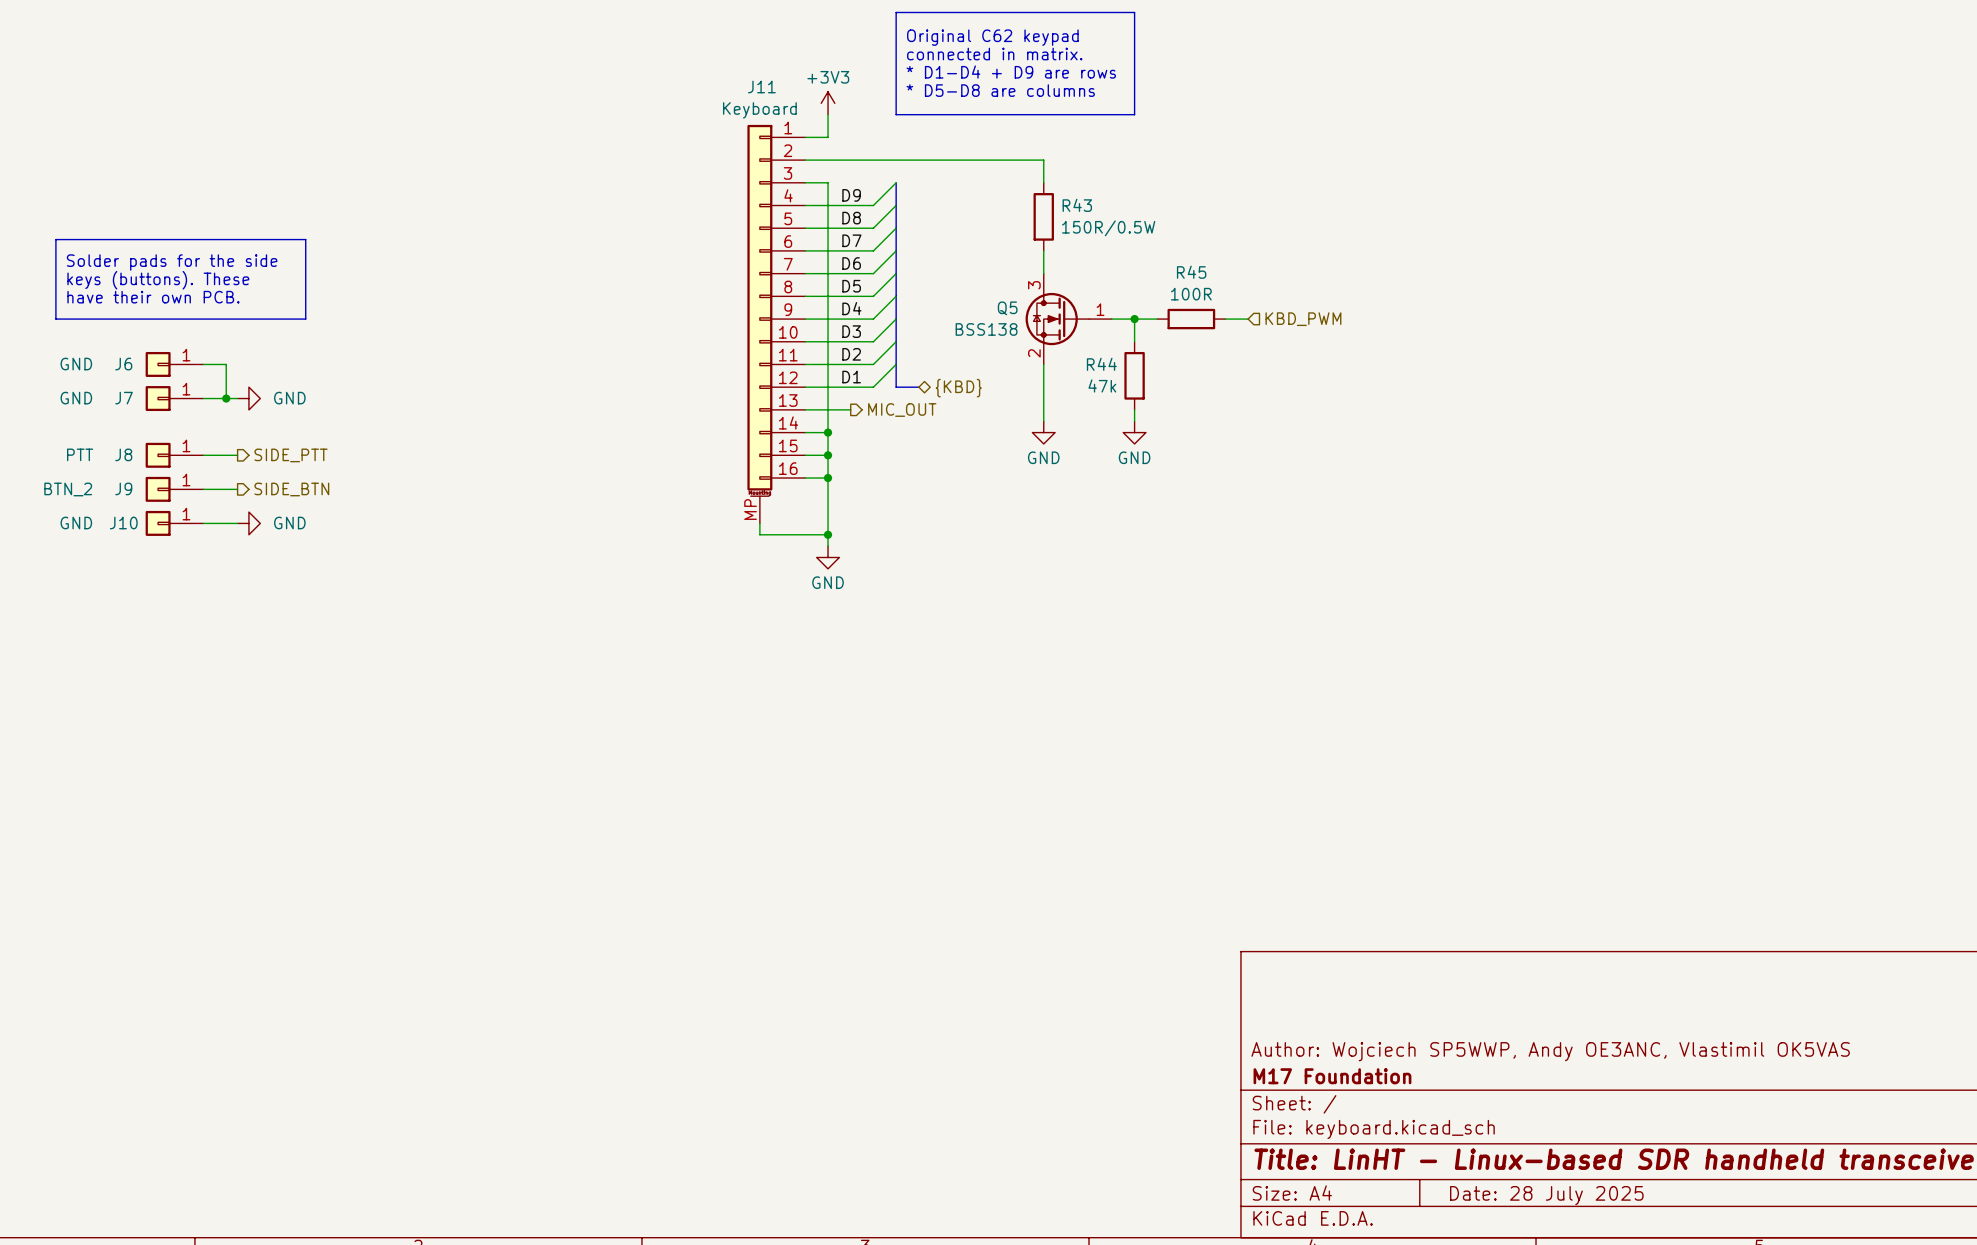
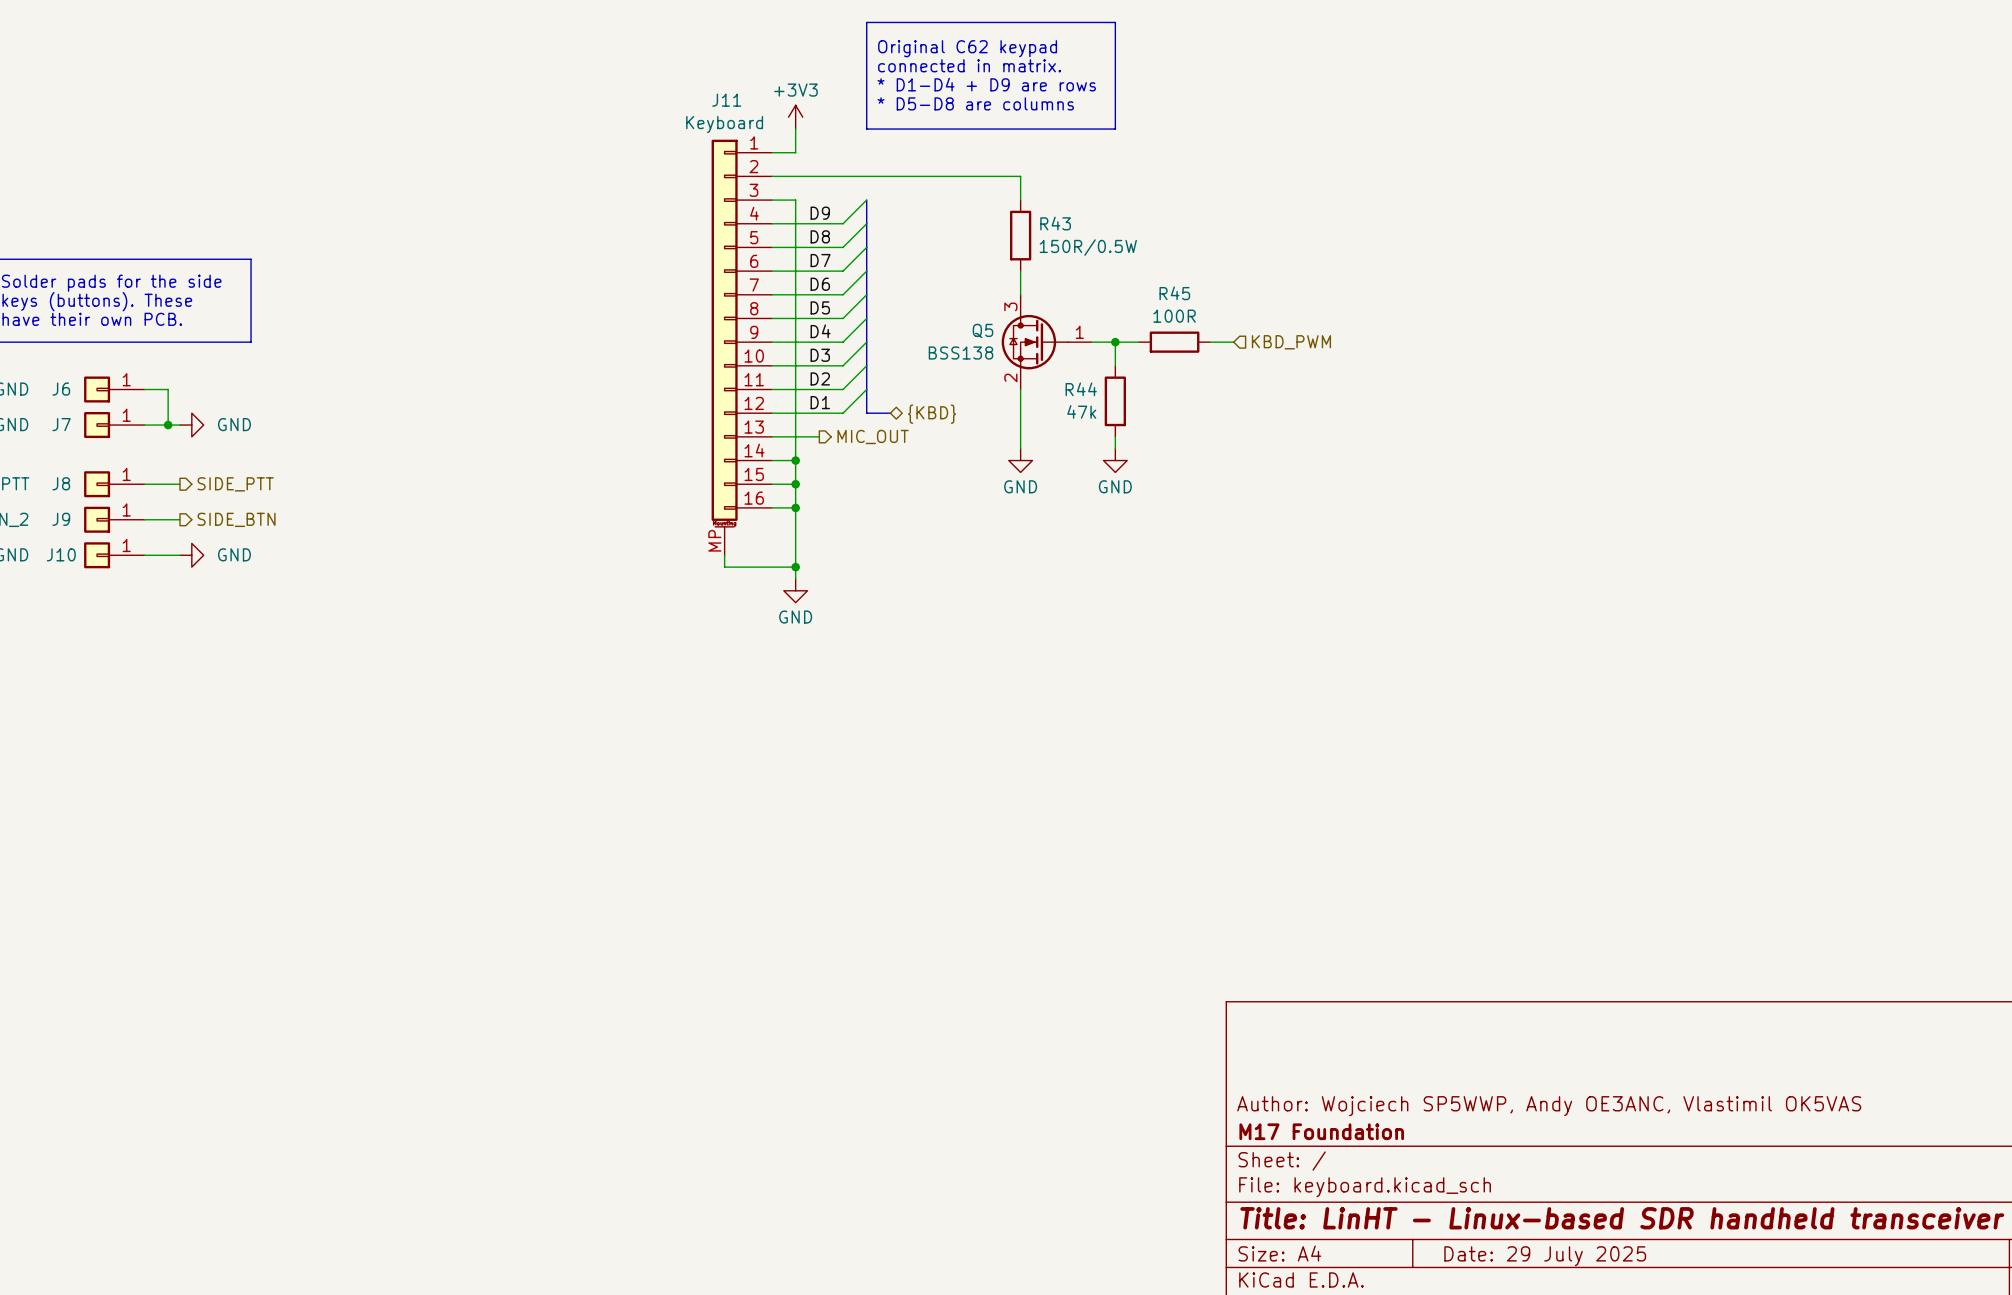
title block: Date: 28 July 2025 (1546, 1195) -> Date: 29 July 2025 (1545, 1256)

